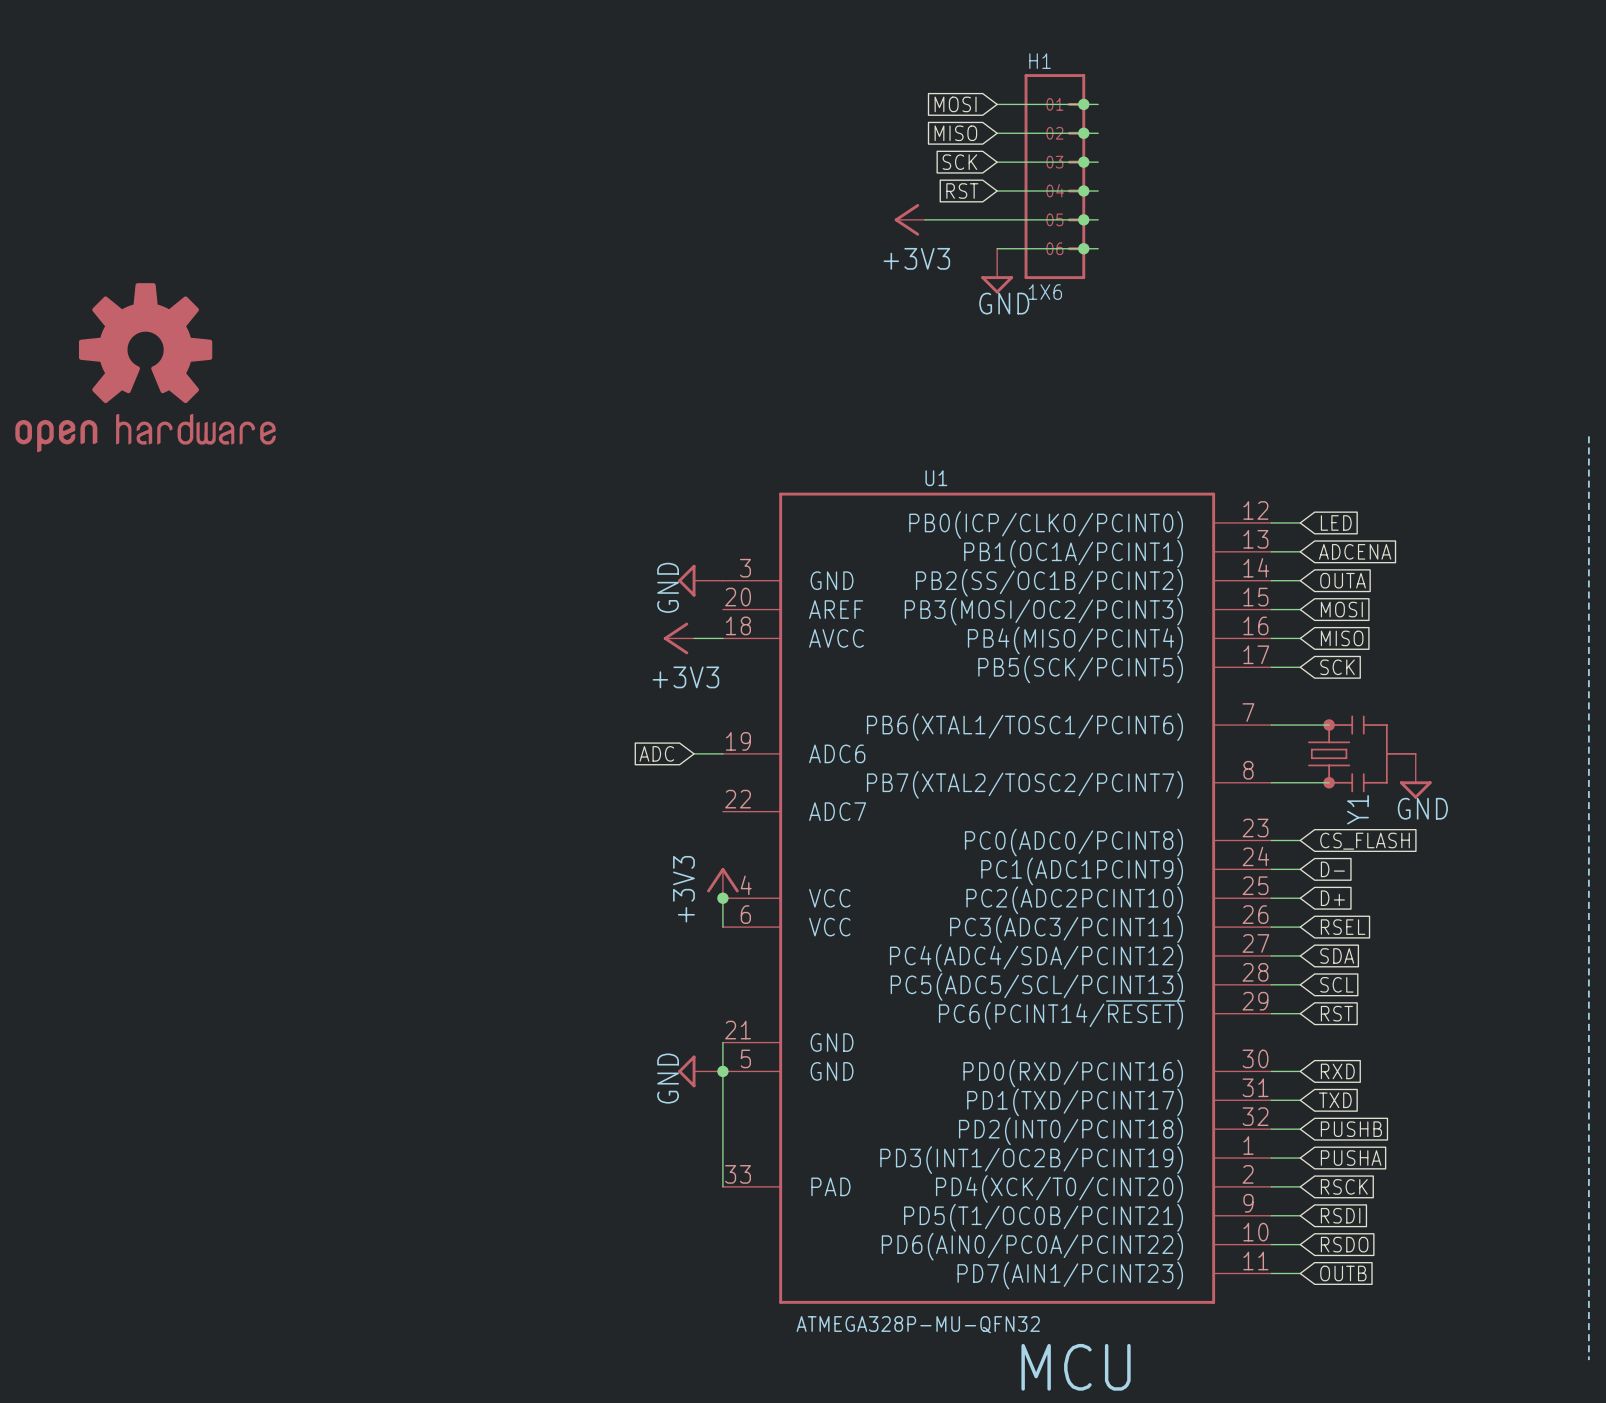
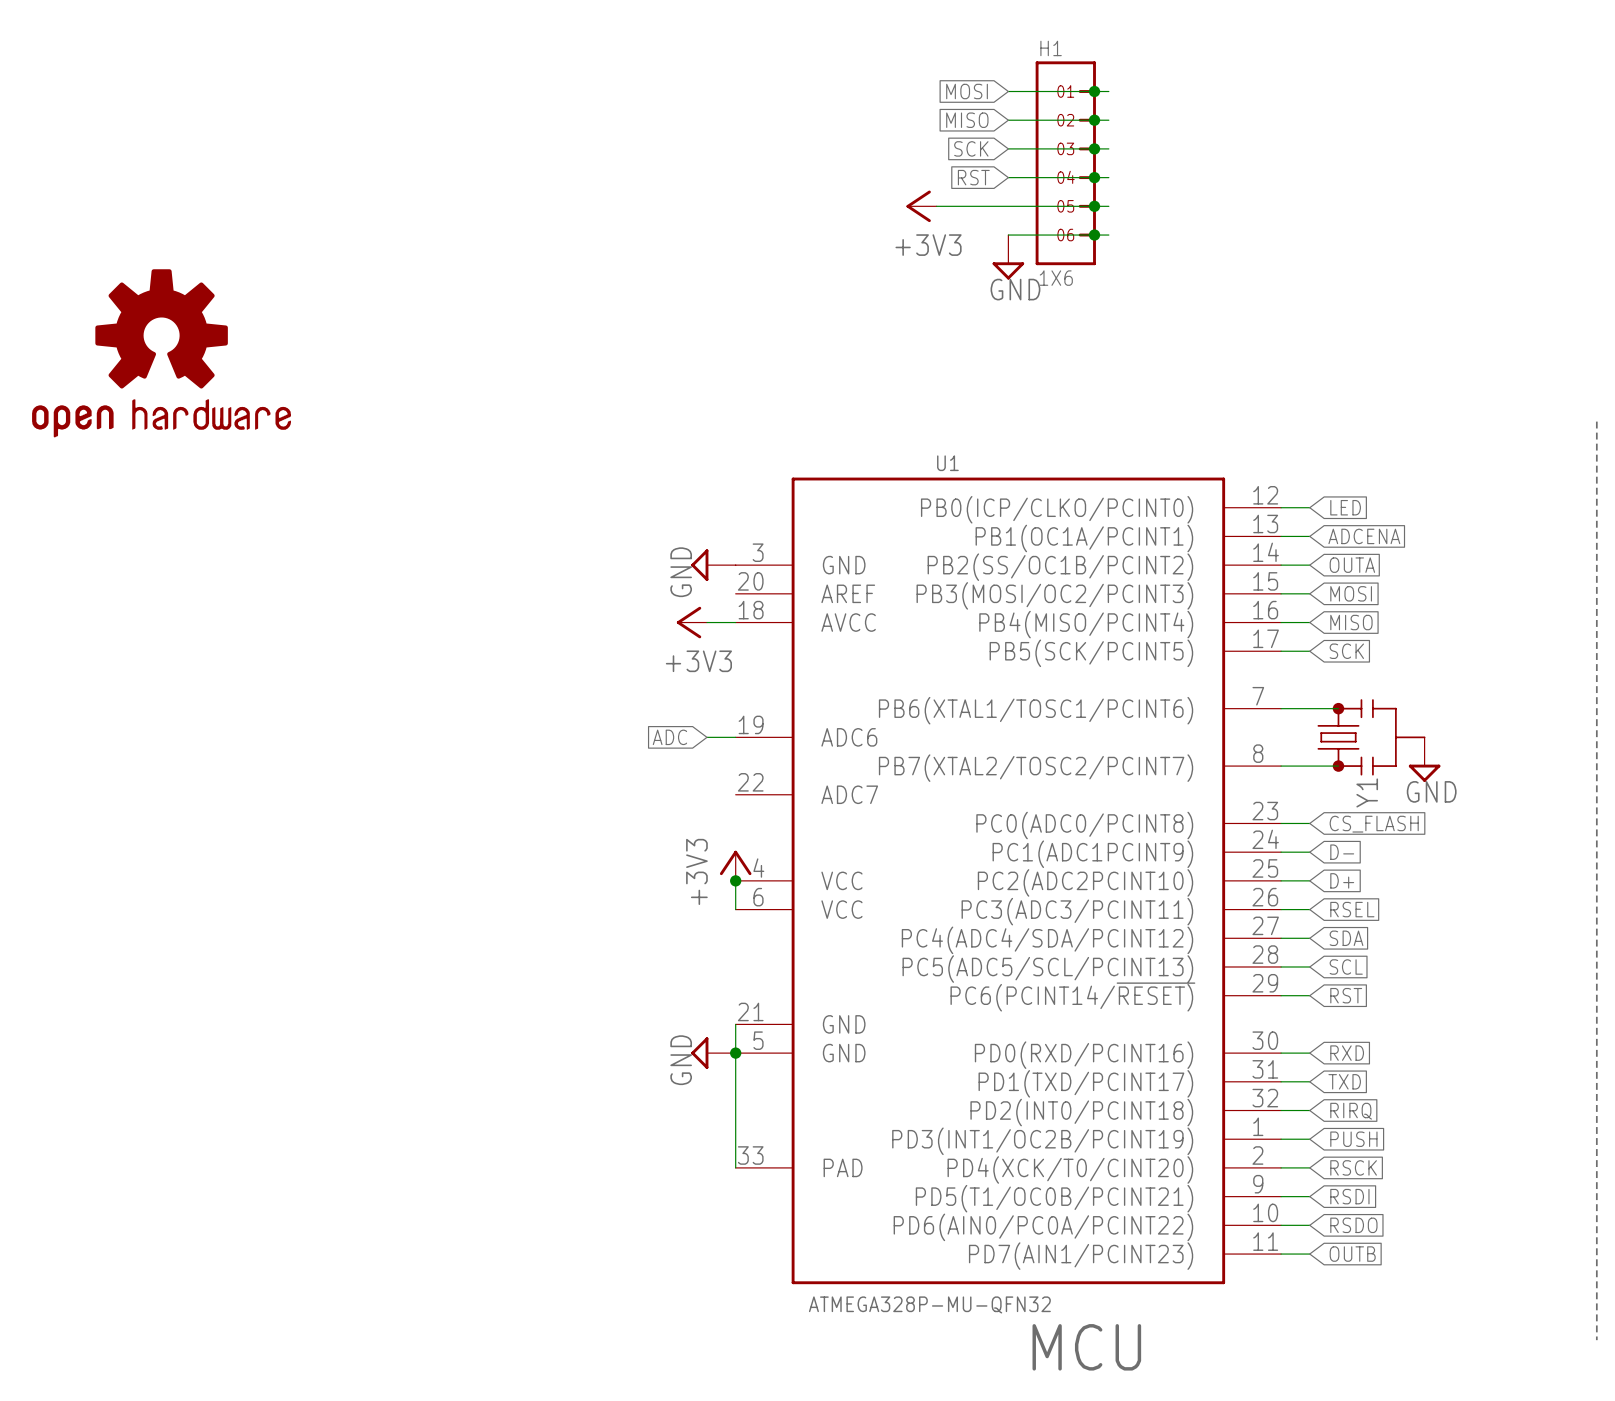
global label: PUSHB (1351, 1129) -> RIRQ (1351, 1111)
global label: PUSHA (1351, 1158) -> PUSH (1353, 1139)

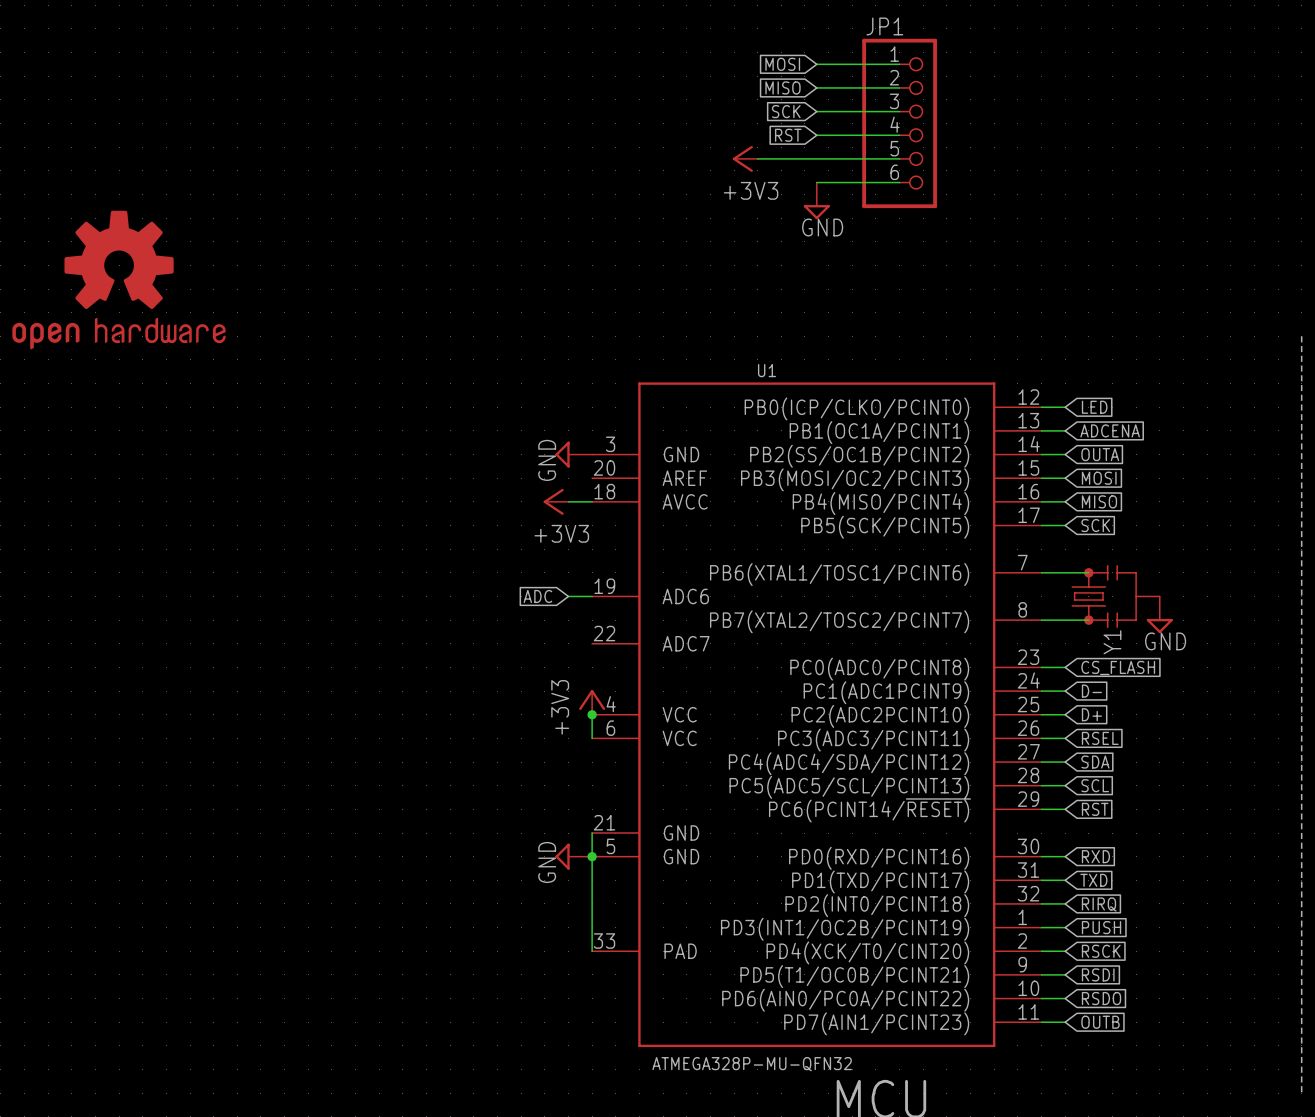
junction: (1094, 91) -> none
junction: (1094, 120) -> none
junction: (1094, 148) -> none
H1: 1X6 (1065, 163) -> none
JP1: none -> (899, 123)
junction: (1094, 177) -> none
junction: (1094, 206) -> none
junction: (1094, 235) -> none

